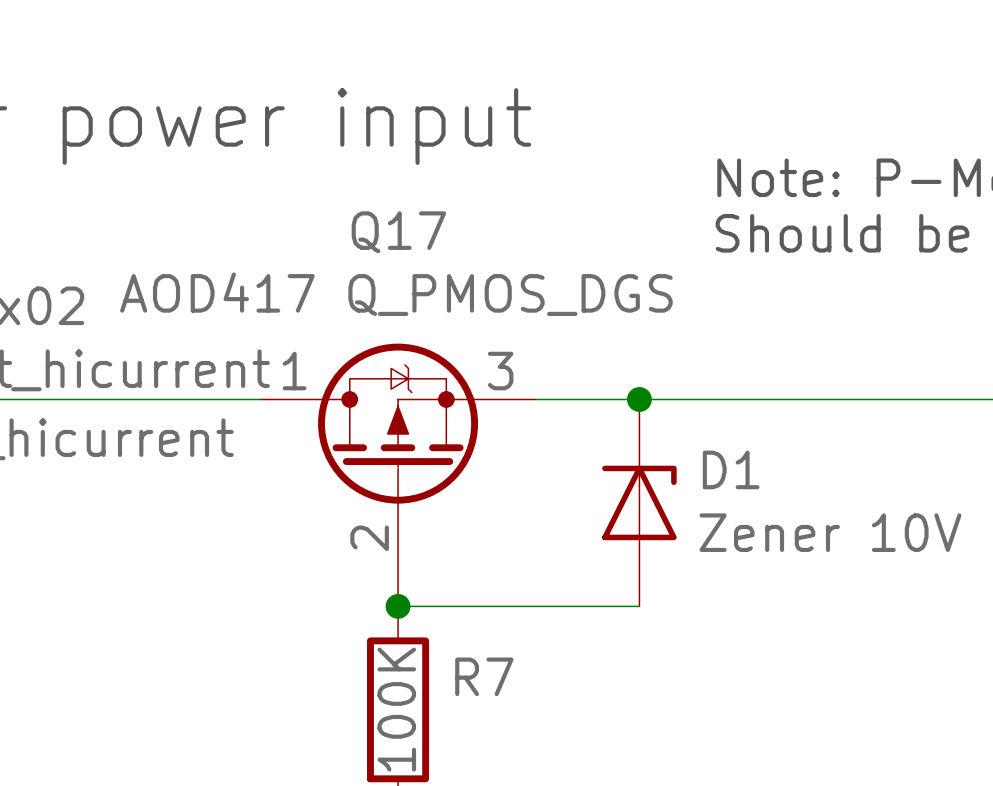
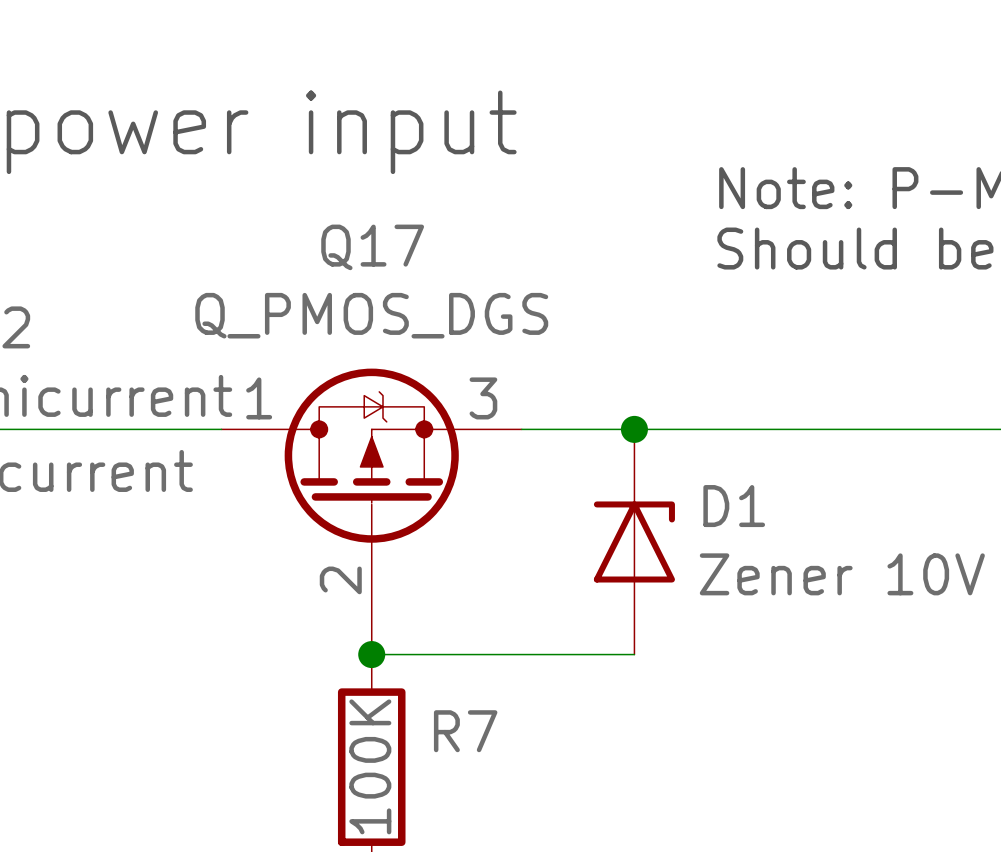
Q17 value: AOD417 Q_PMOS_DGS (396, 294) -> Q_PMOS_DGS (371, 315)

